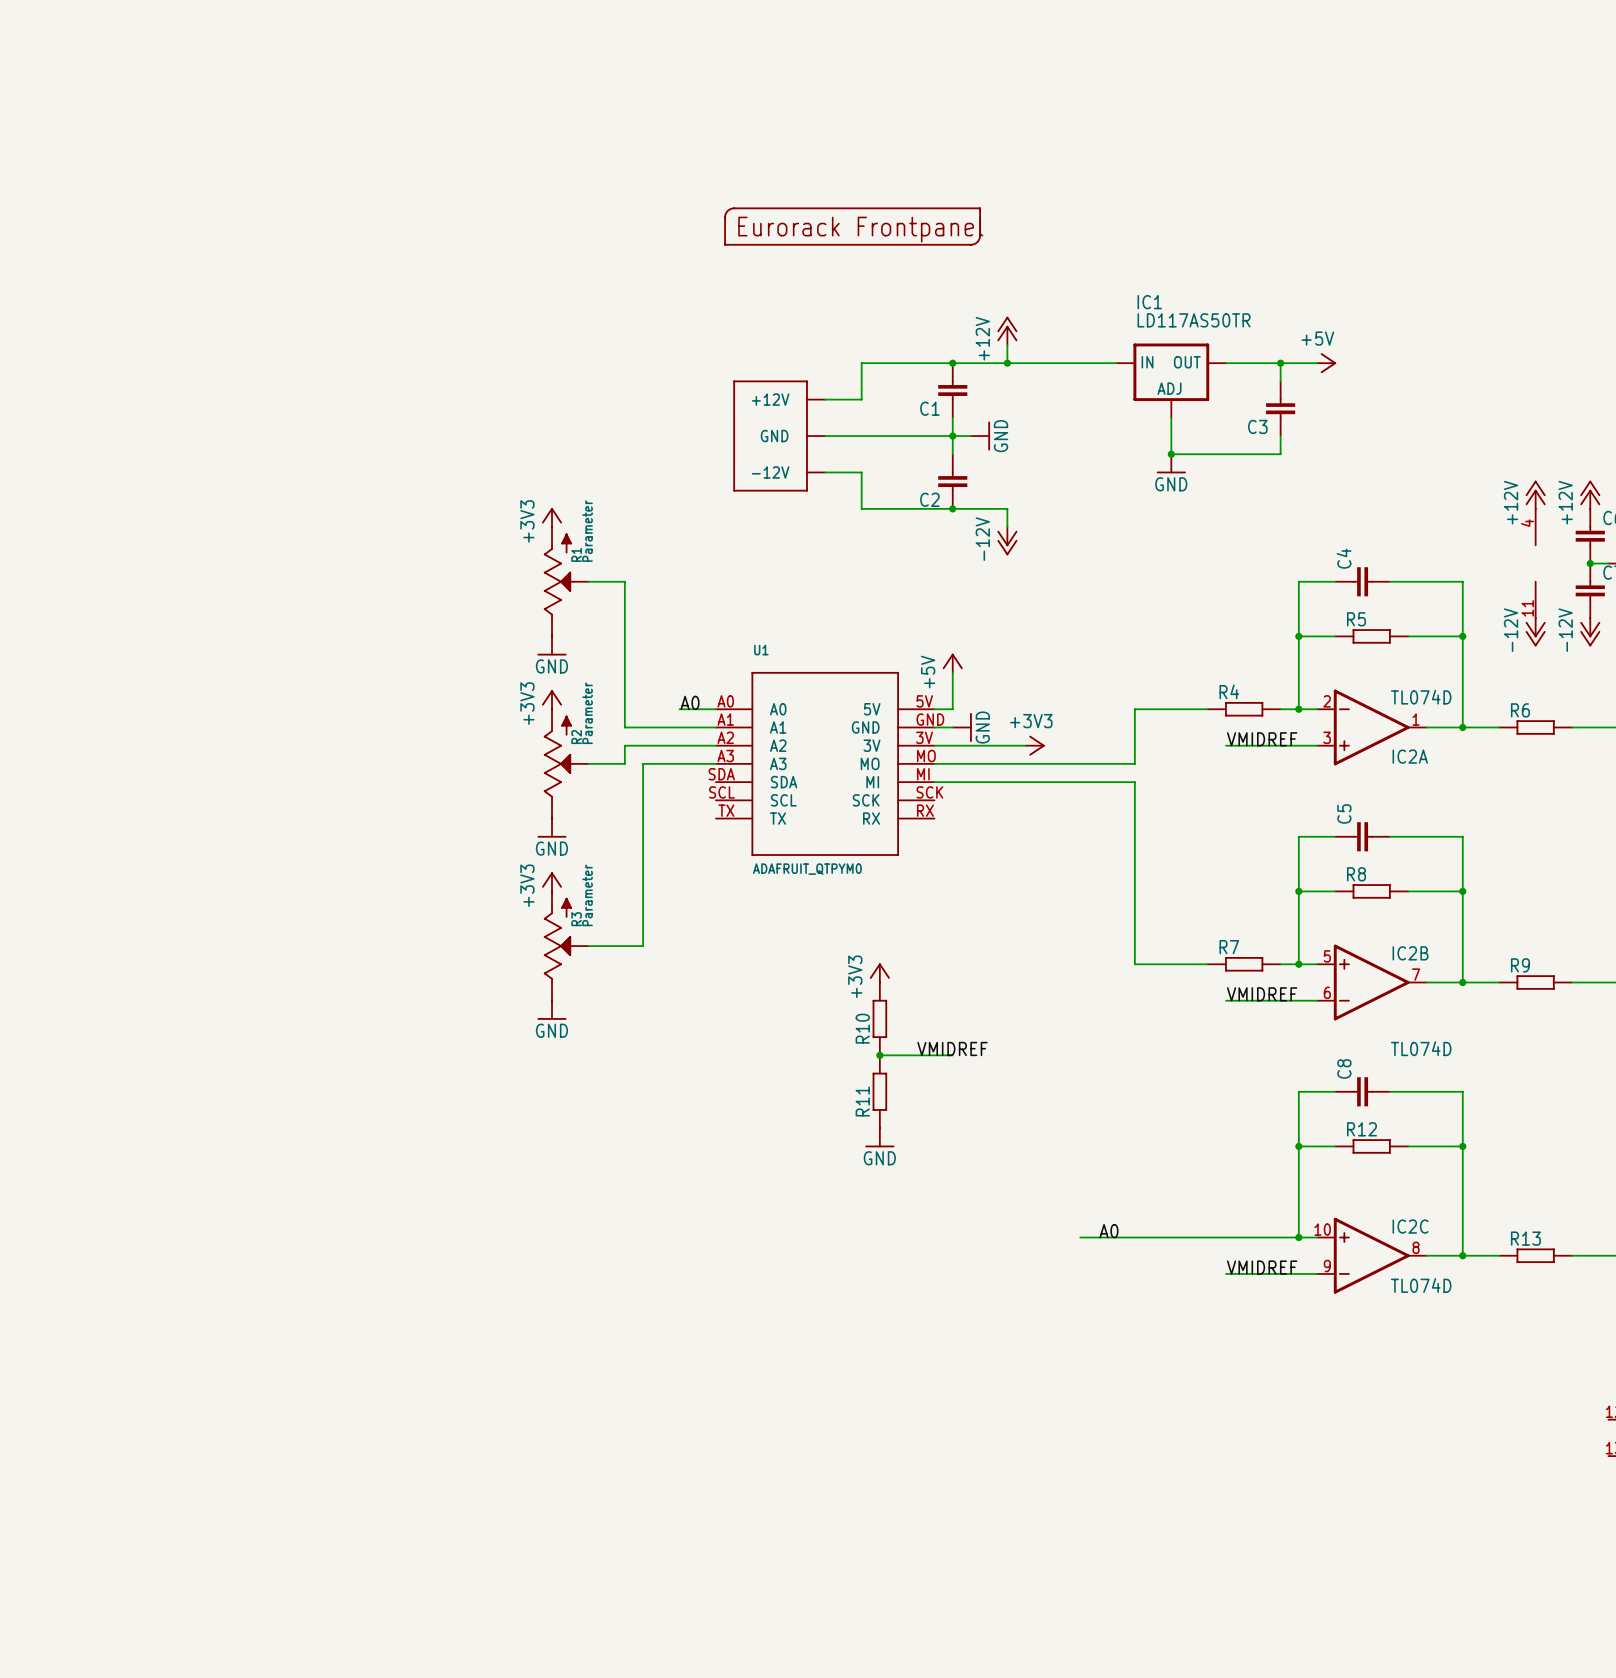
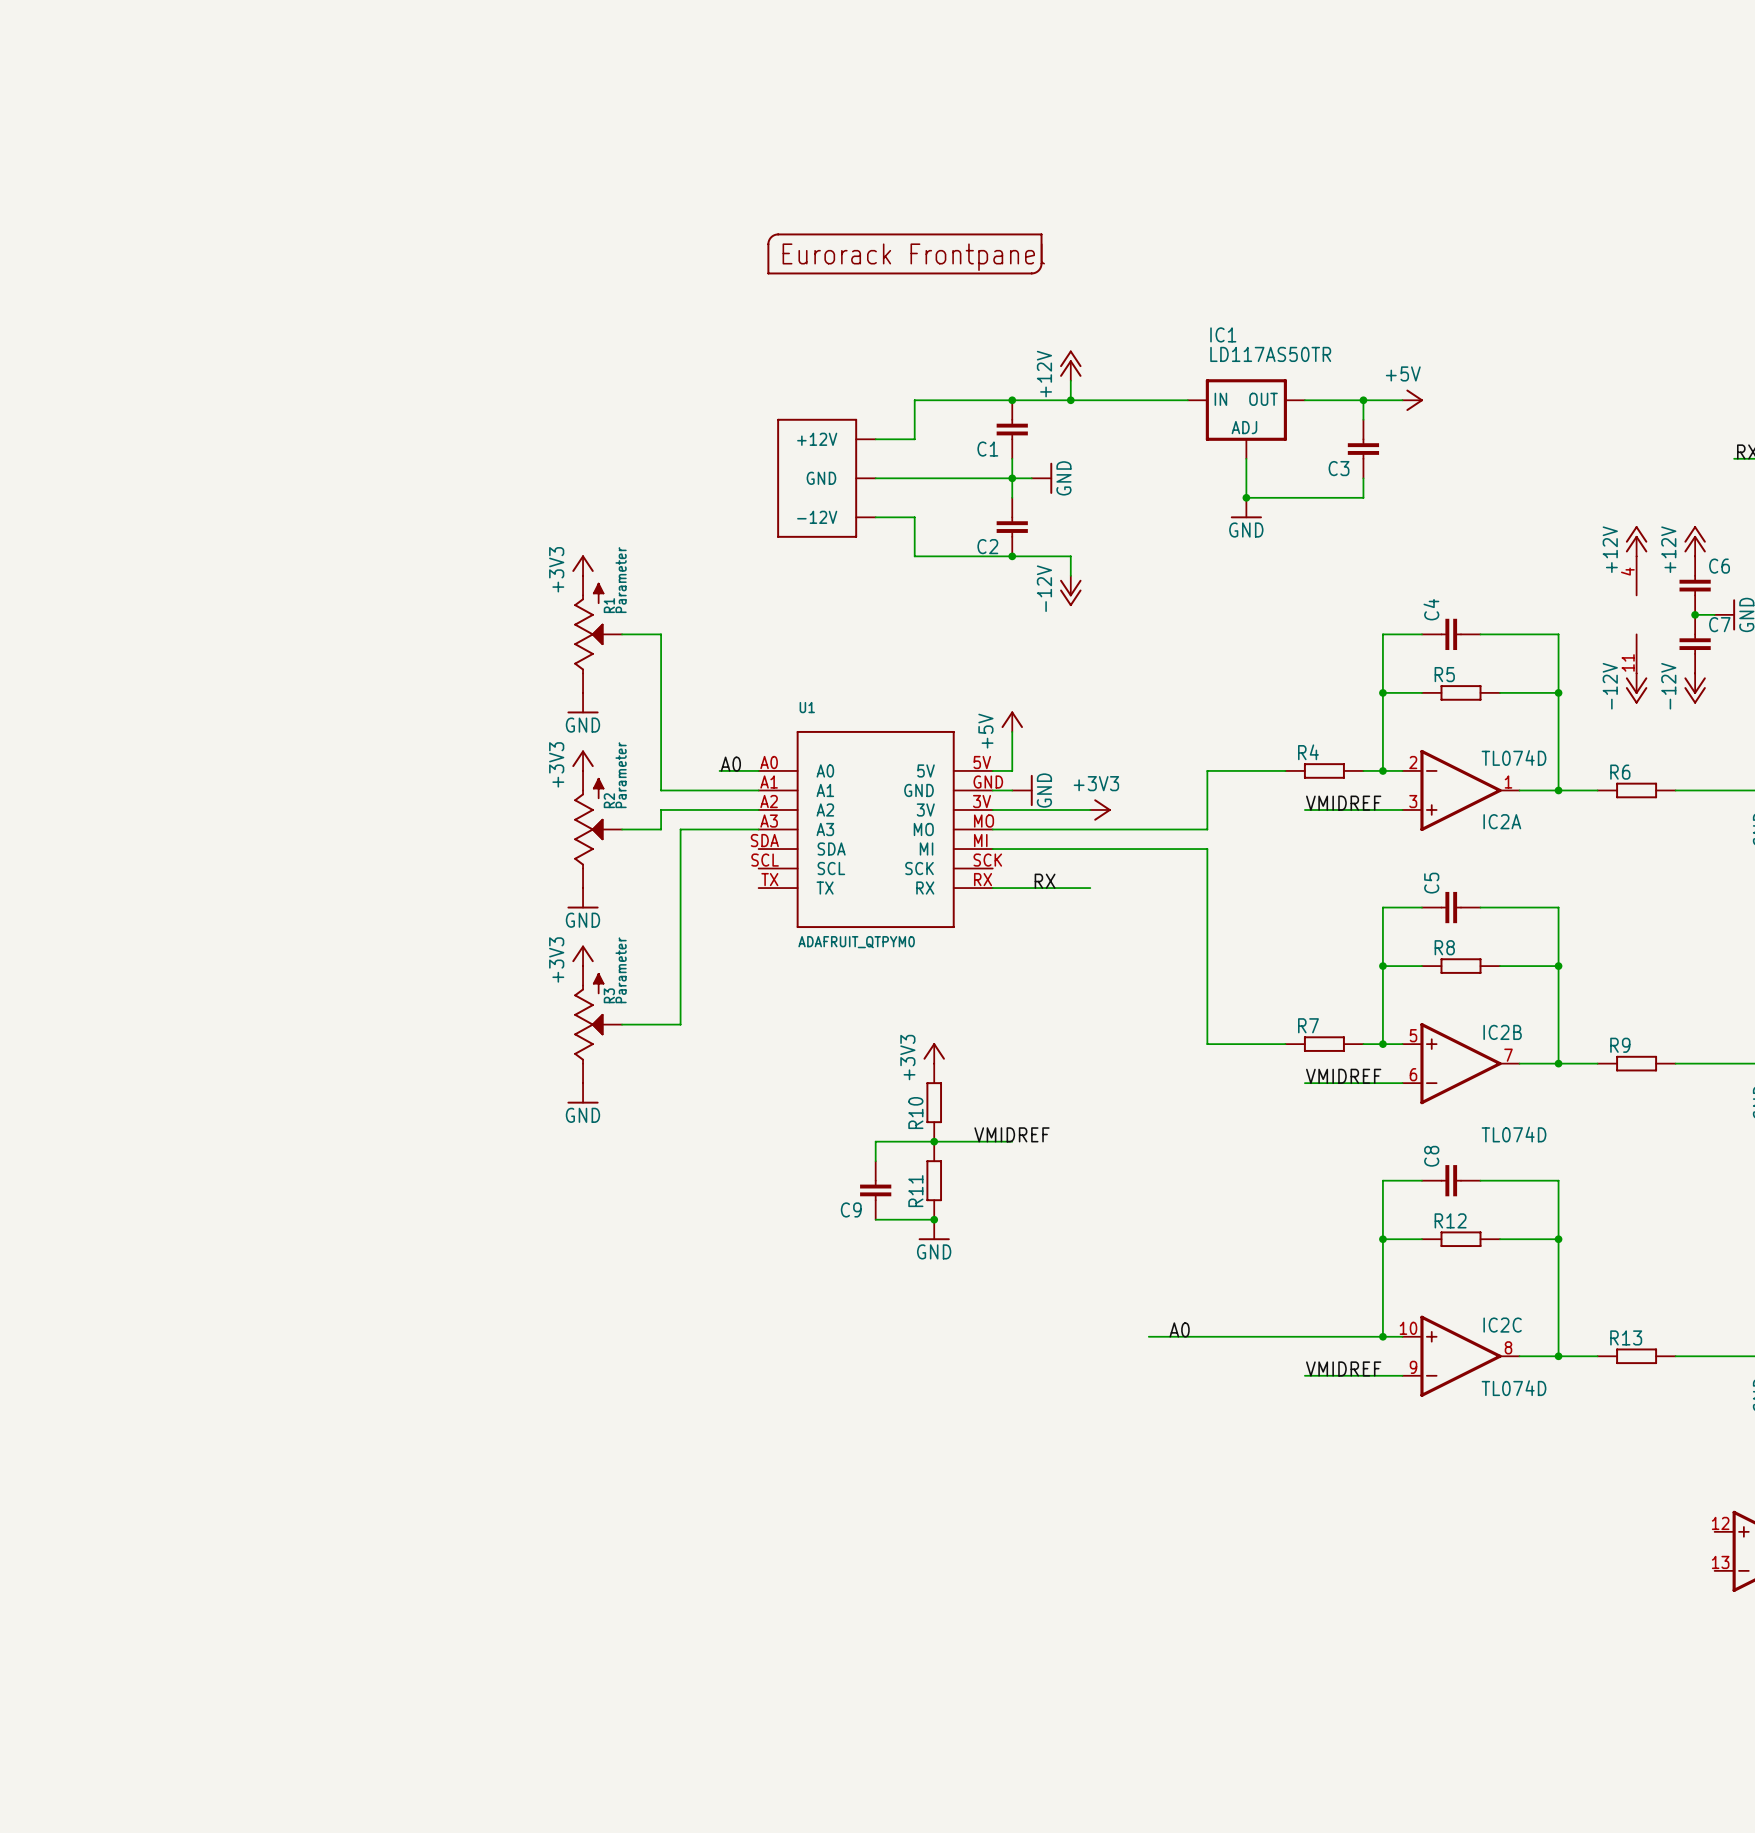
label: none -> RX (1045, 881)
wire: none -> (992, 888) (1090, 888)
wire: none -> (934, 1141) (875, 1141) (875, 1161)
C9: none -> (875, 1190)
wire: none -> (875, 1219) (934, 1219)
junction: none -> (934, 1219)

